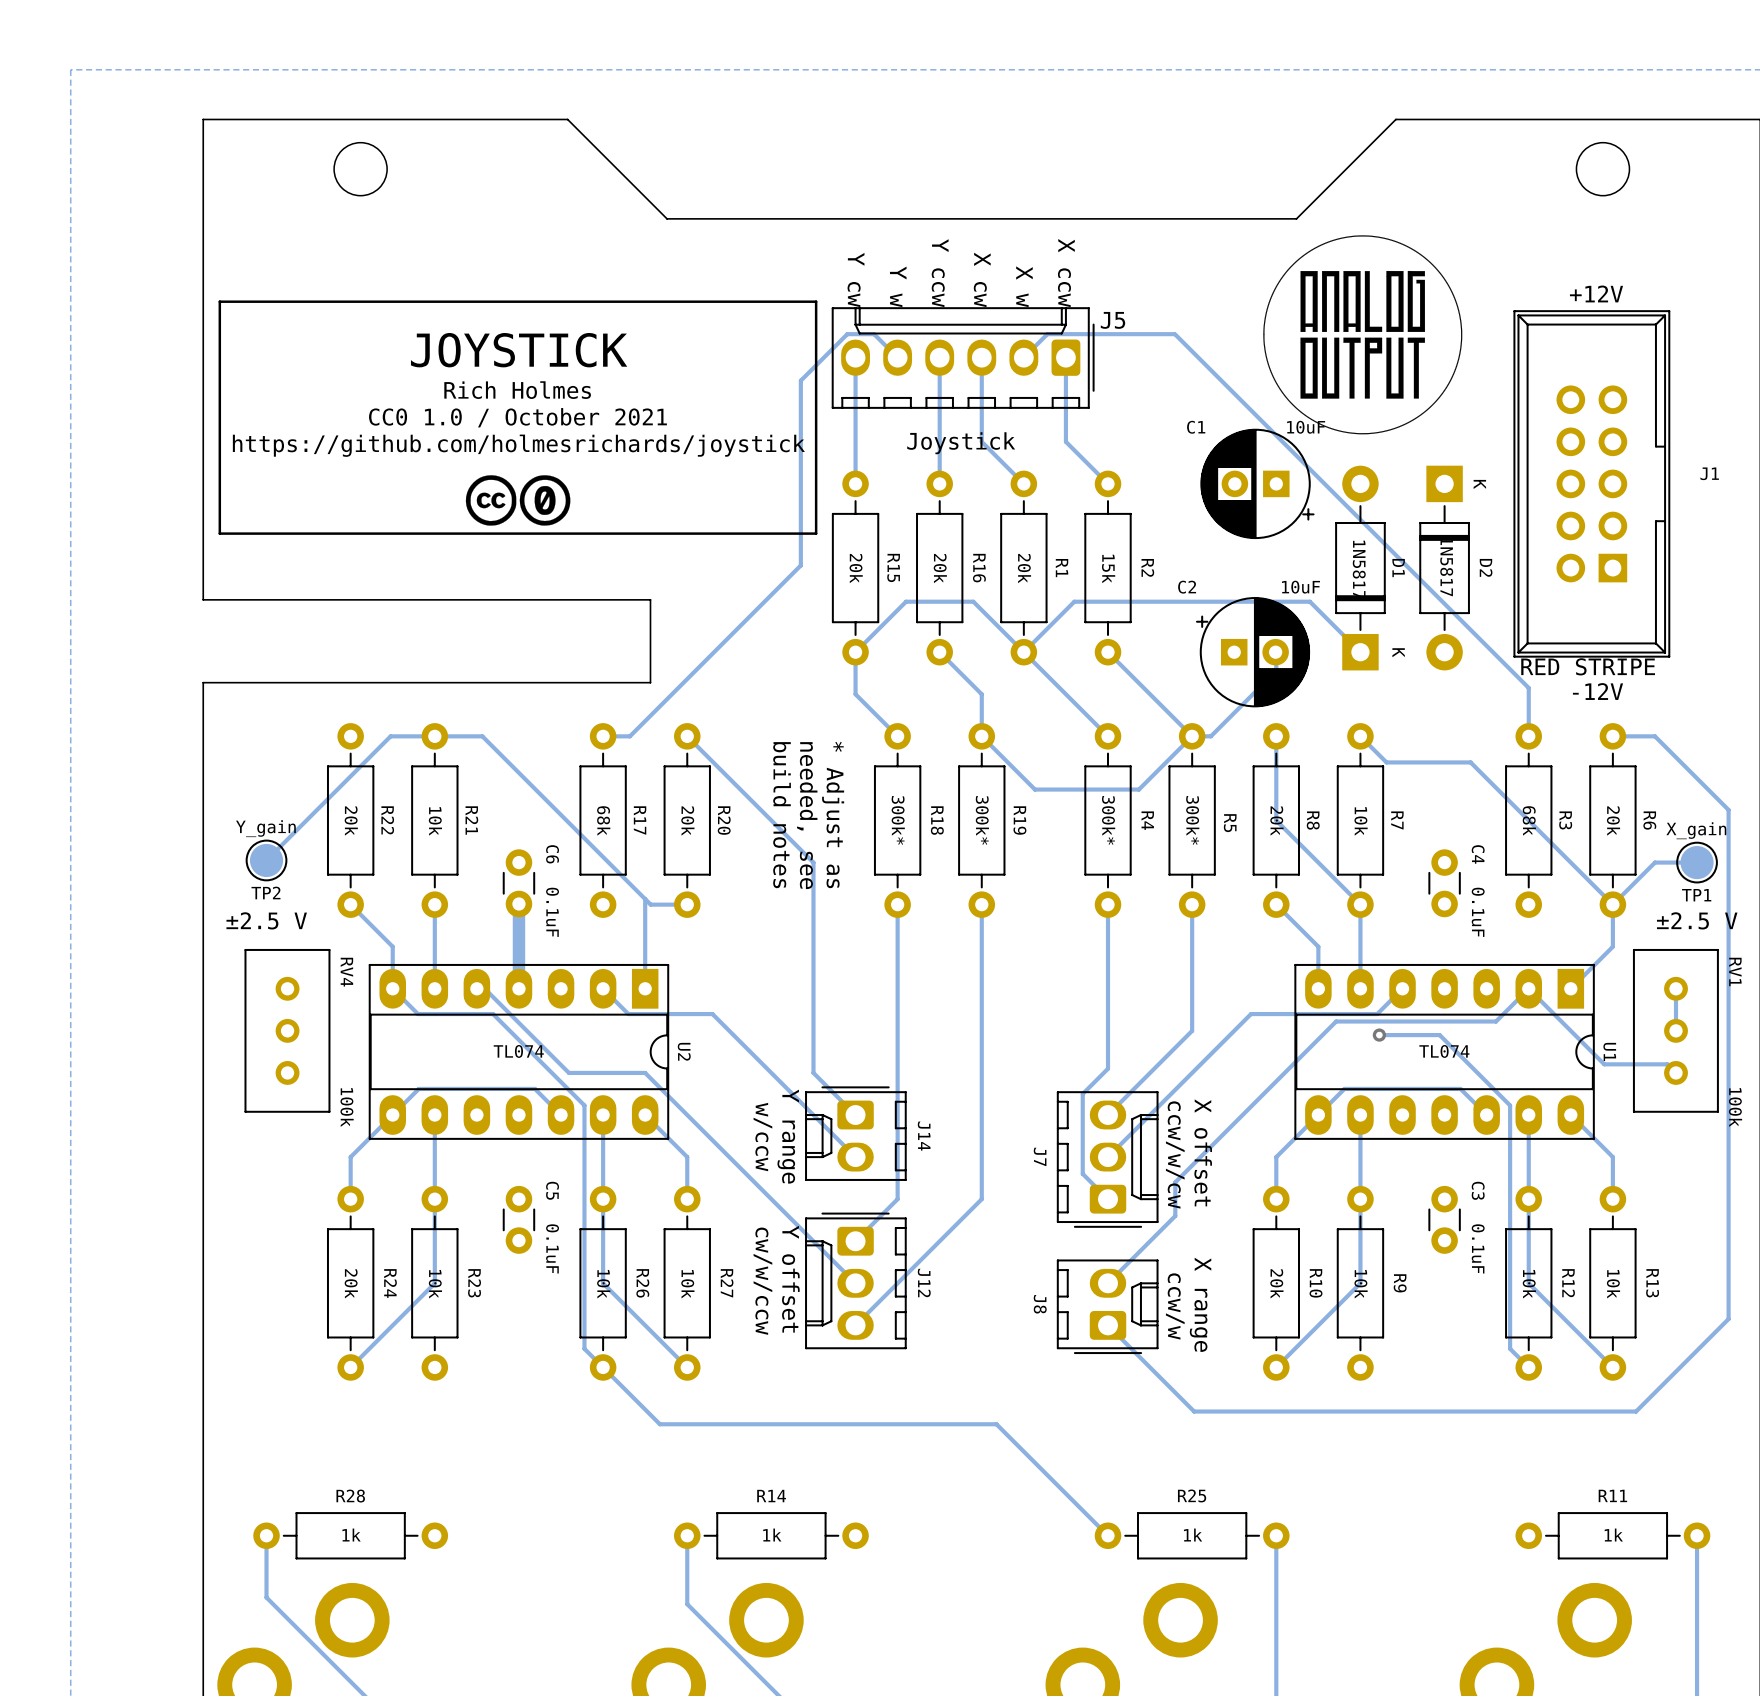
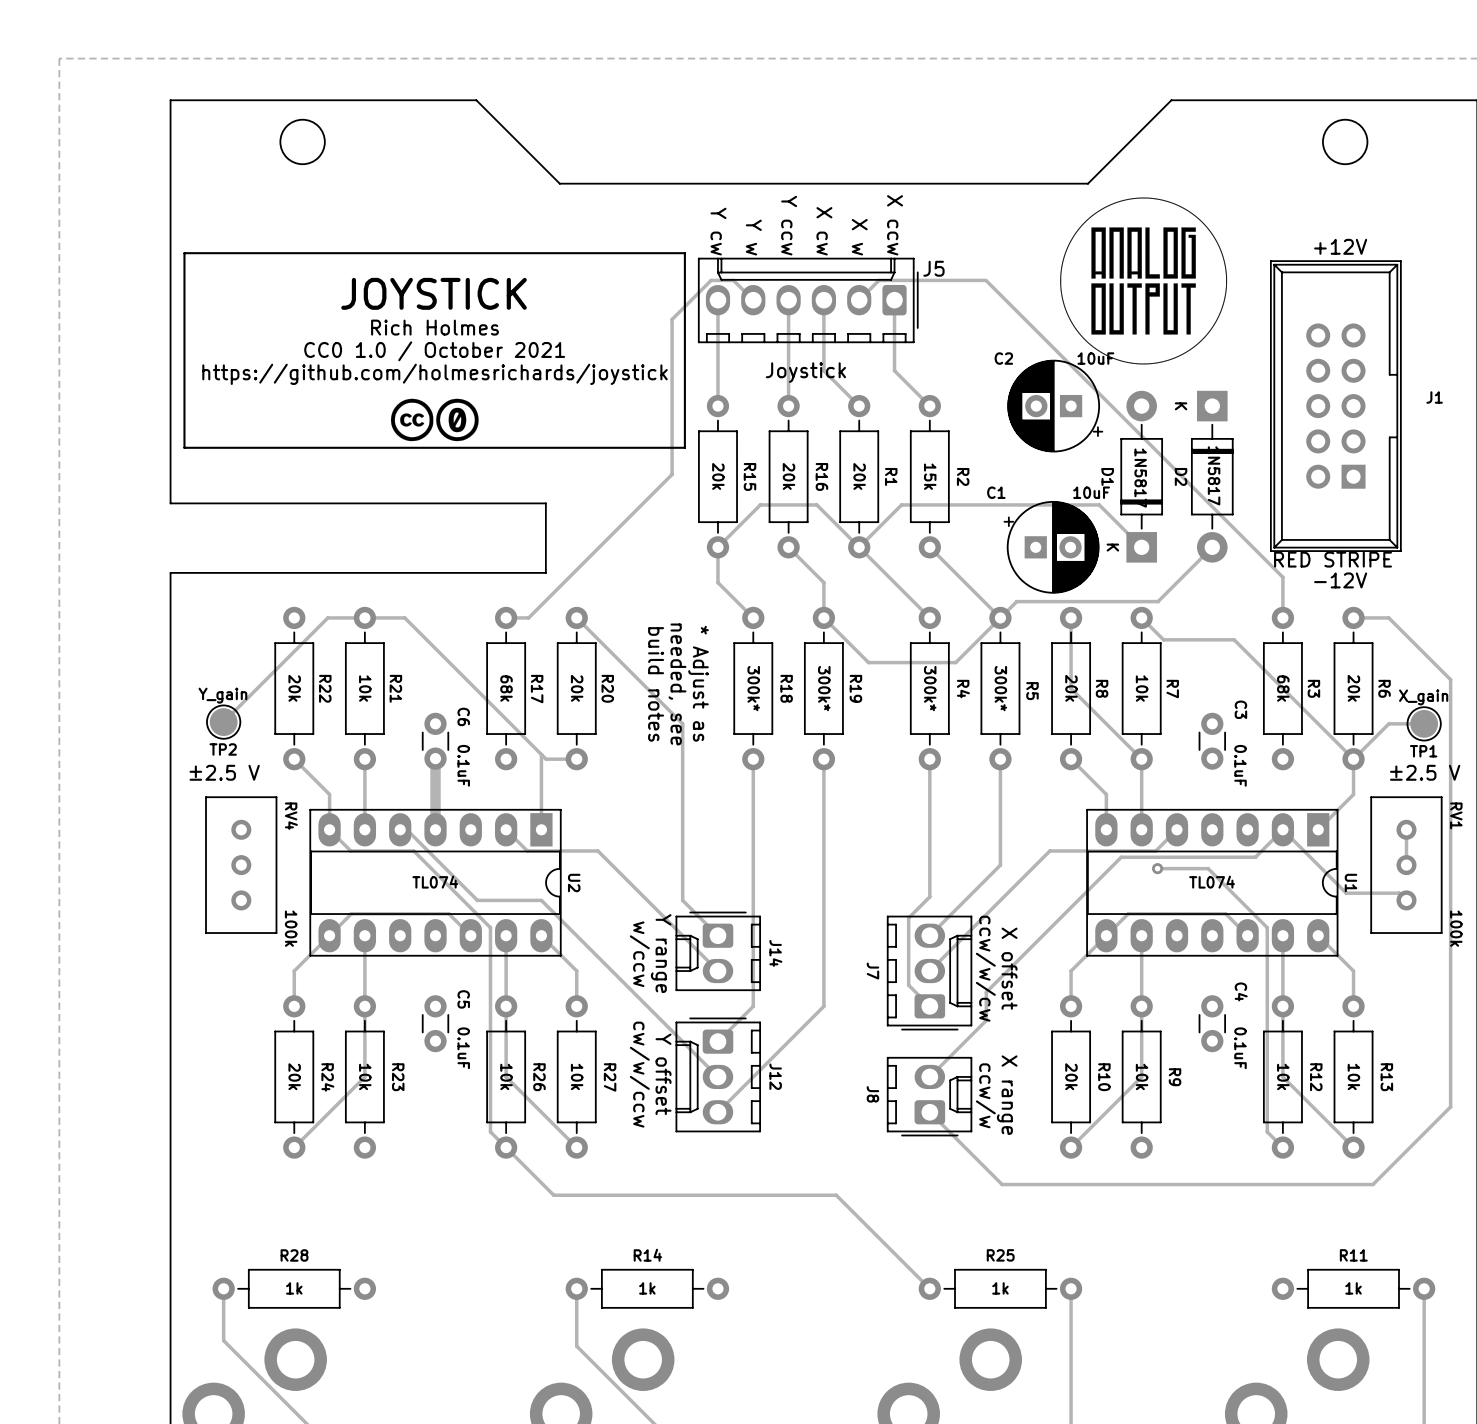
C1 name: C1 (1196, 427) -> C2 (1003, 358)
D2 text position: K (1479, 484) -> K (1181, 406)
D2 name position: D2 (1486, 567) -> D2 (1181, 476)
D1 name position: D1 (1398, 568) -> D1 (1107, 476)
C2 name: C2 (1187, 587) -> C1 (996, 492)
track: (1276, 652) (1276, 670) (1210, 736) (1192, 736) -> (1212, 547) (1158, 601) (1016, 601) (1000, 617)
D1 text position: K (1398, 652) -> K (1112, 547)
C4 name: C4 (1478, 854) -> C3 (1240, 709)
C3 name: C3 (1478, 1190) -> C4 (1241, 991)

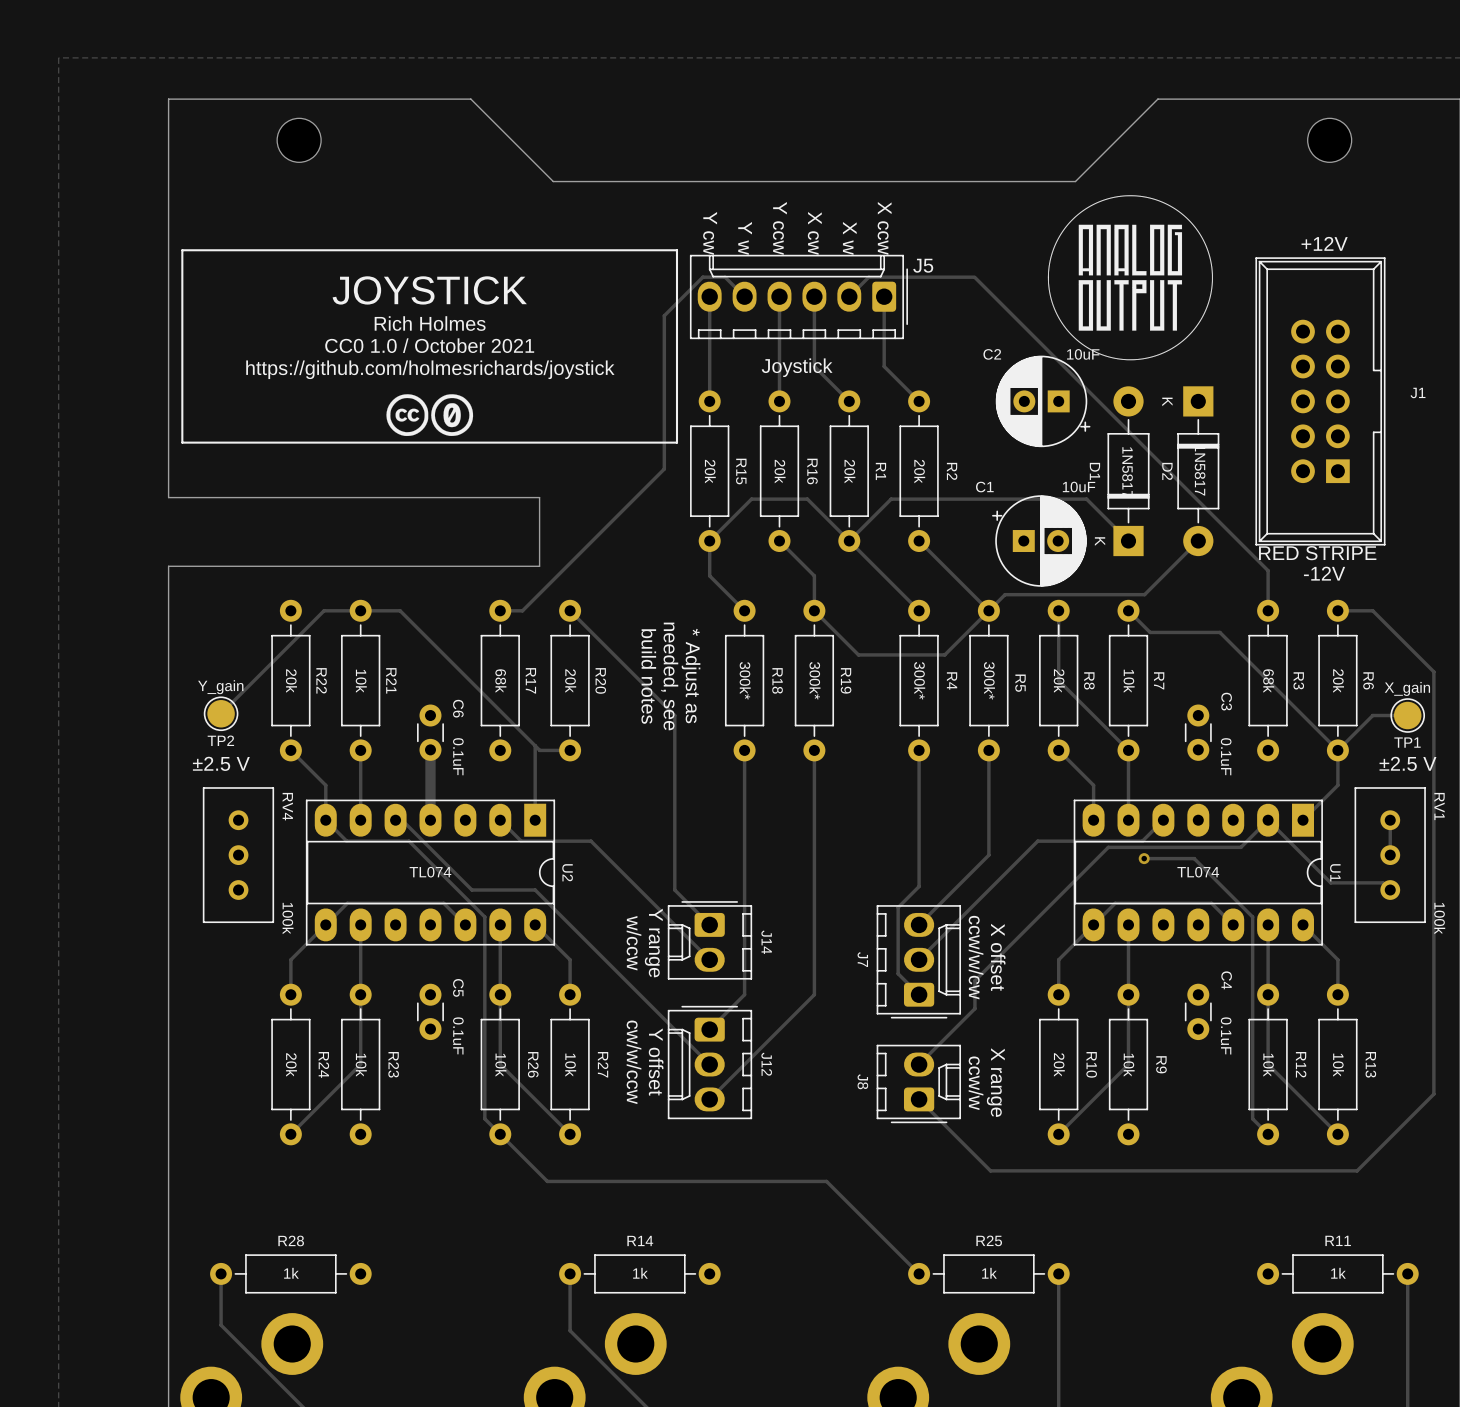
R2 value: 15k (930, 476) -> 20k (919, 471)

